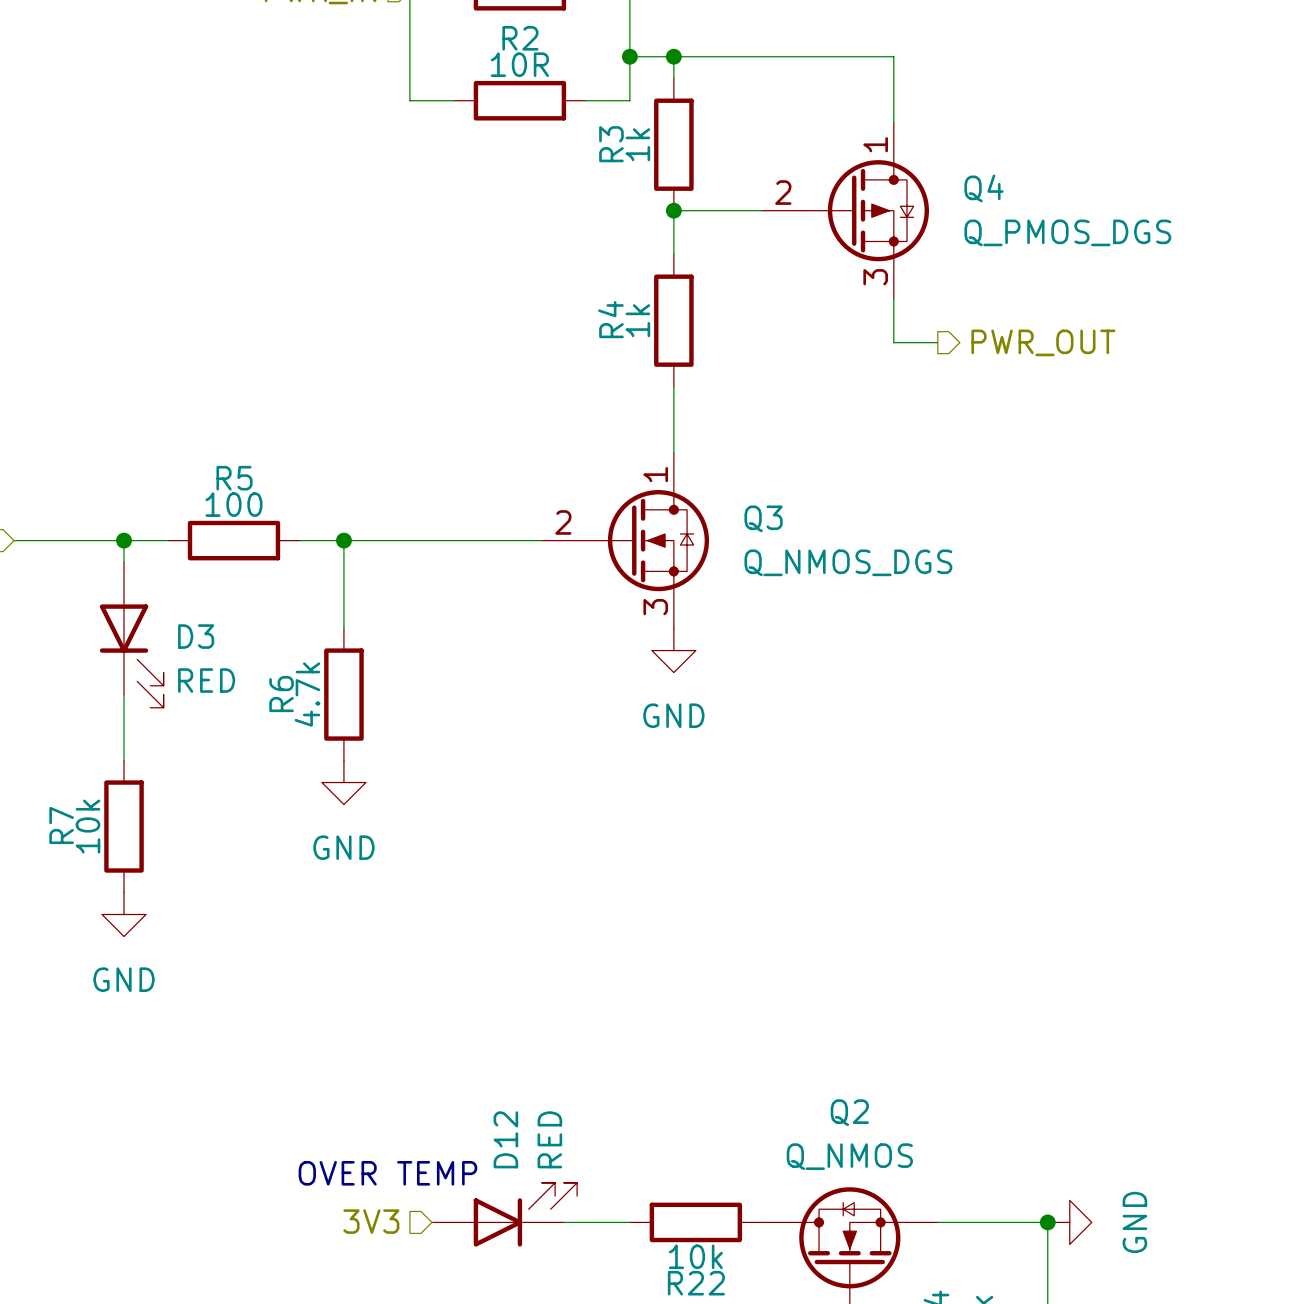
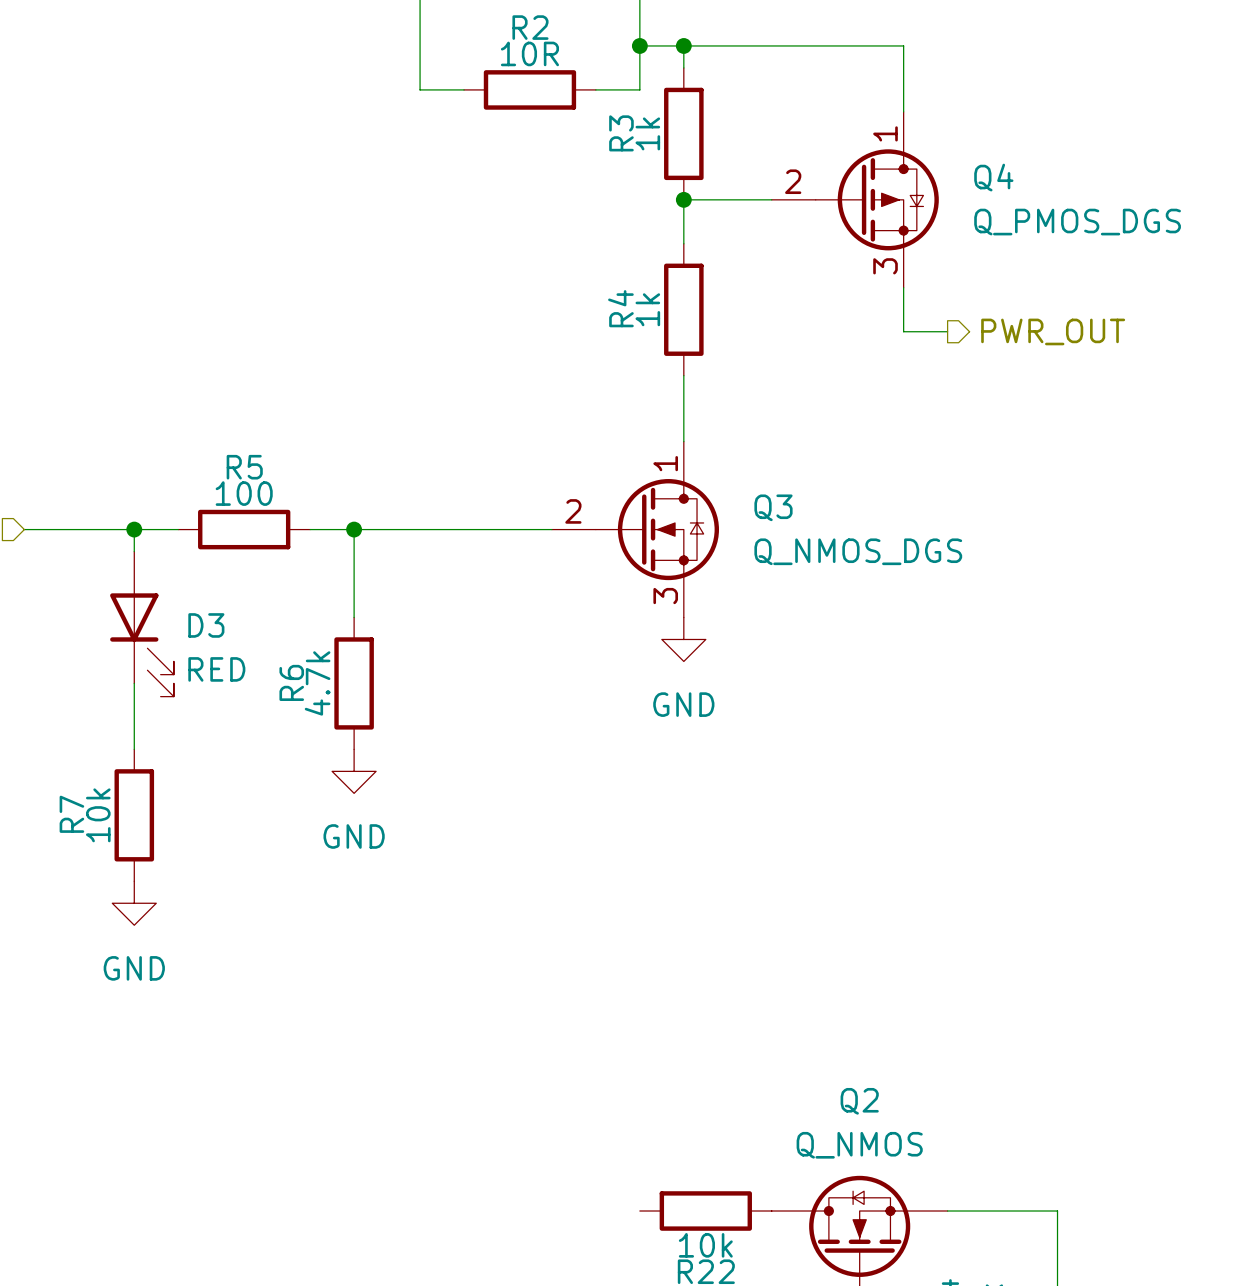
text: OVER TEMP (387, 1173) -> none
D12: RED (504, 1214) -> none
hierarchical label: 3V3 (371, 1221) -> none
wire: (563, 1222) (629, 1222) -> none
junction: (1047, 1222) -> none
power symbol: GND (1069, 1222) -> none

